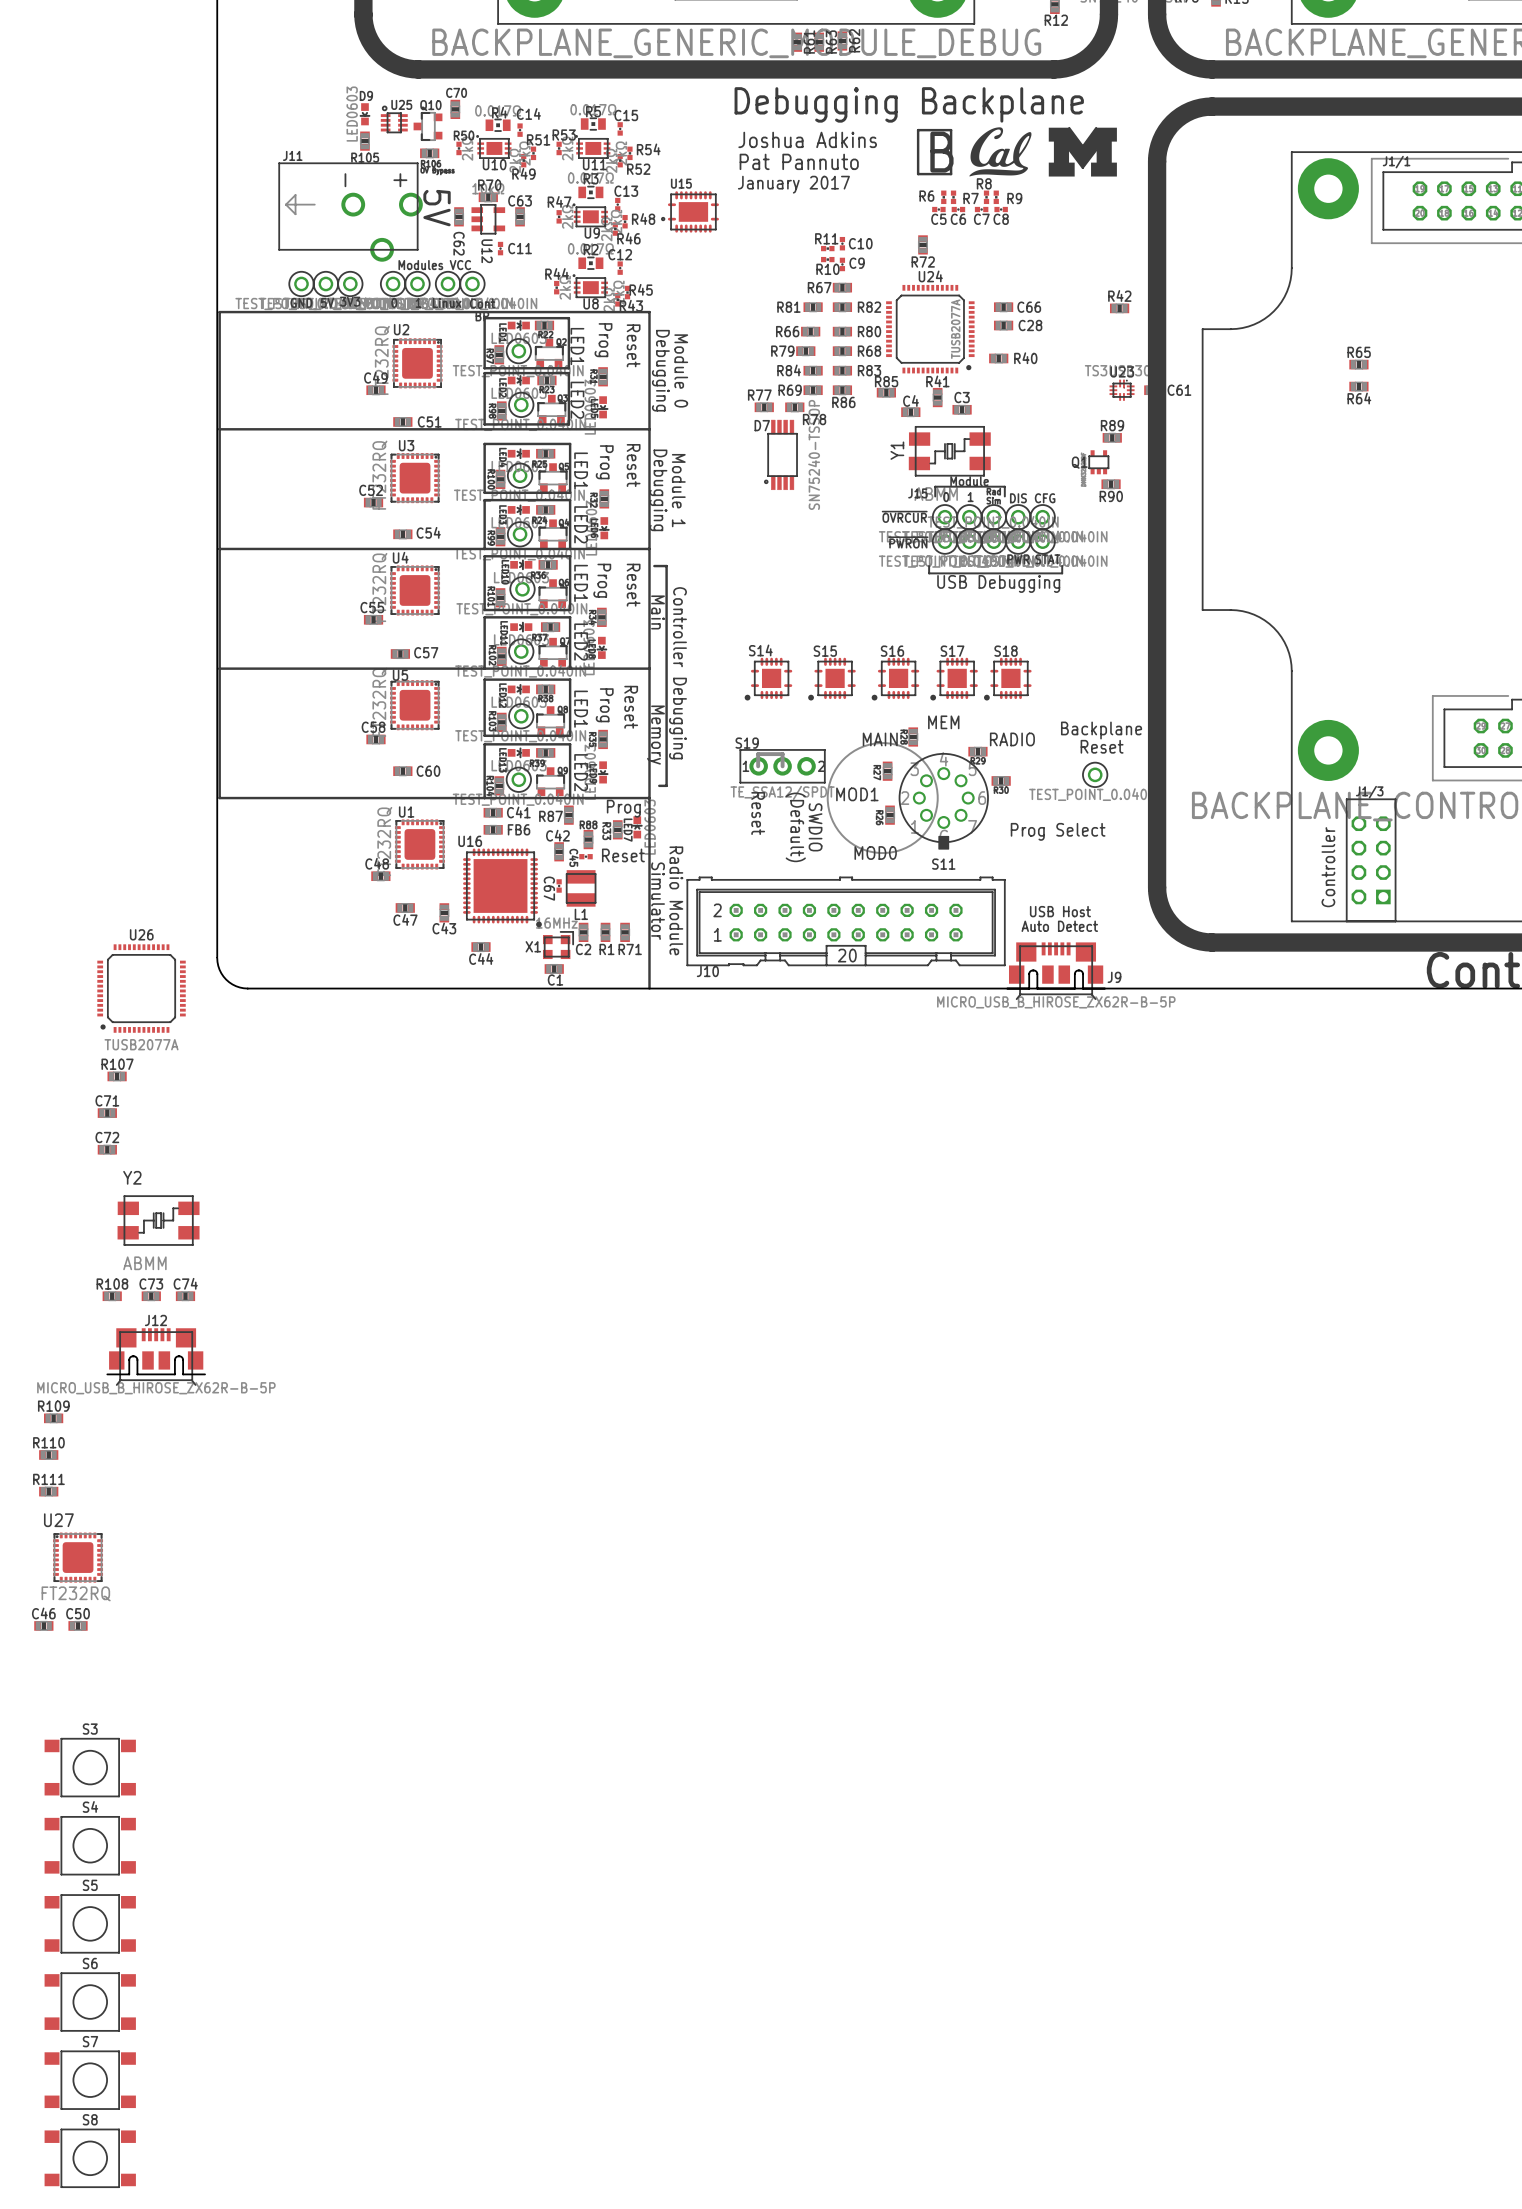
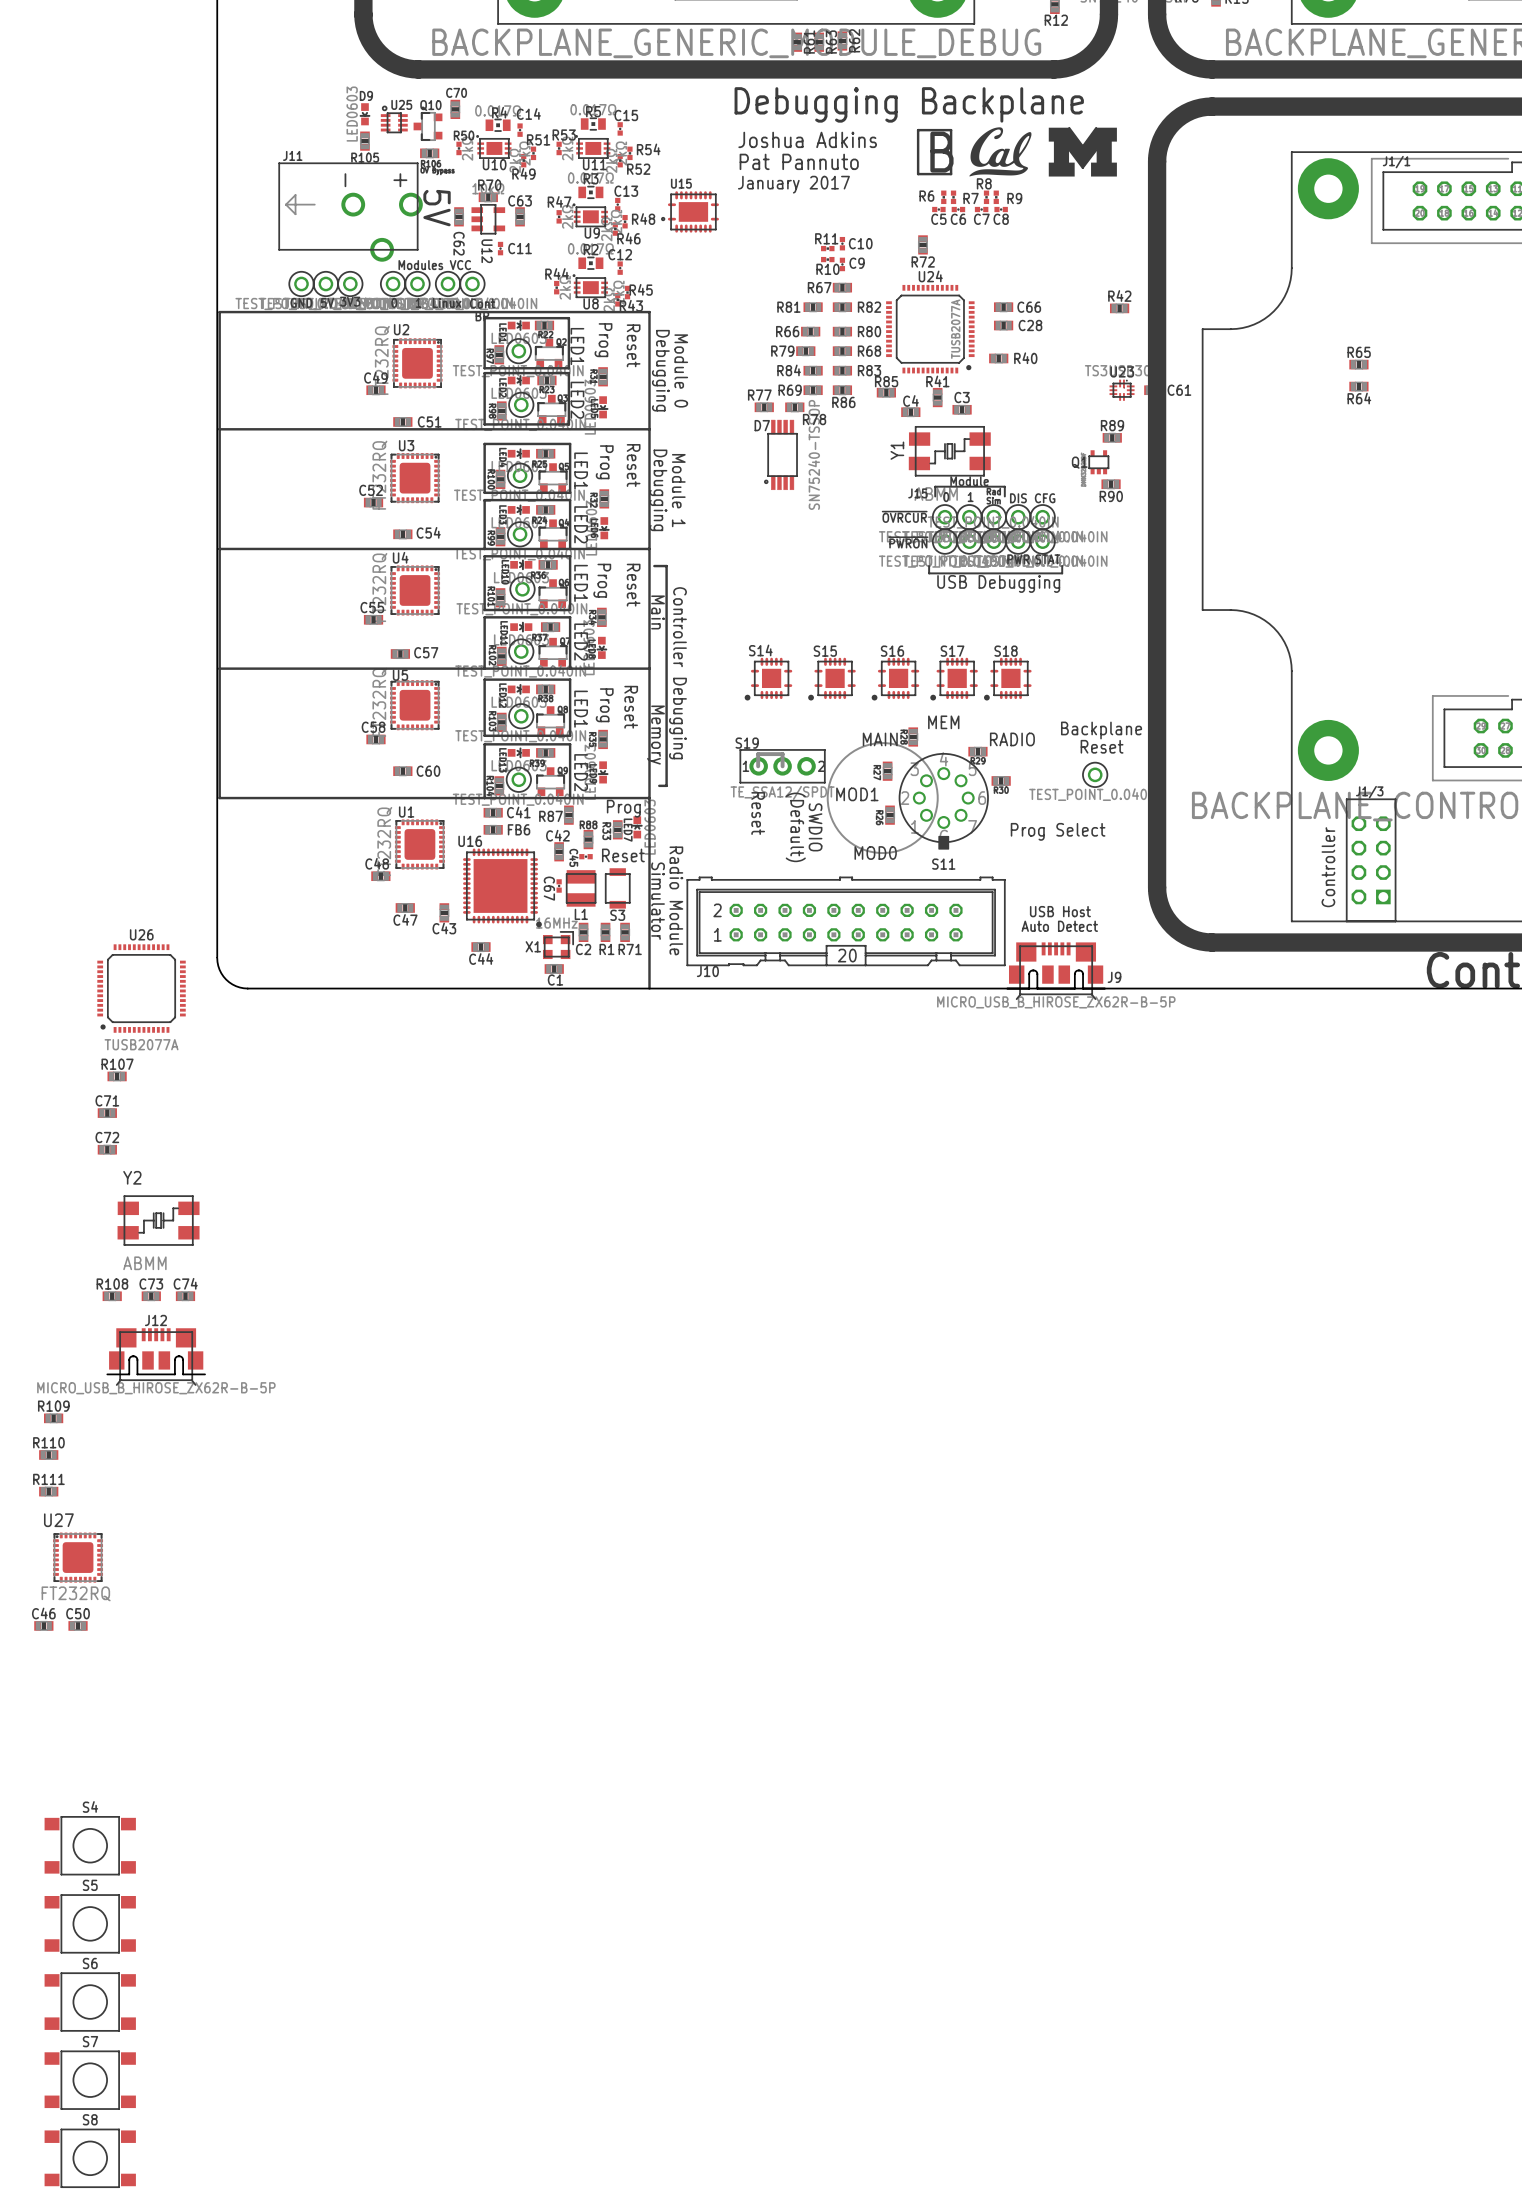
S3 name position: S3 (90, 1729) -> S3 (617, 915)
S3 footprint: [44, 1738, 136, 1798] -> [605, 868, 631, 909]

